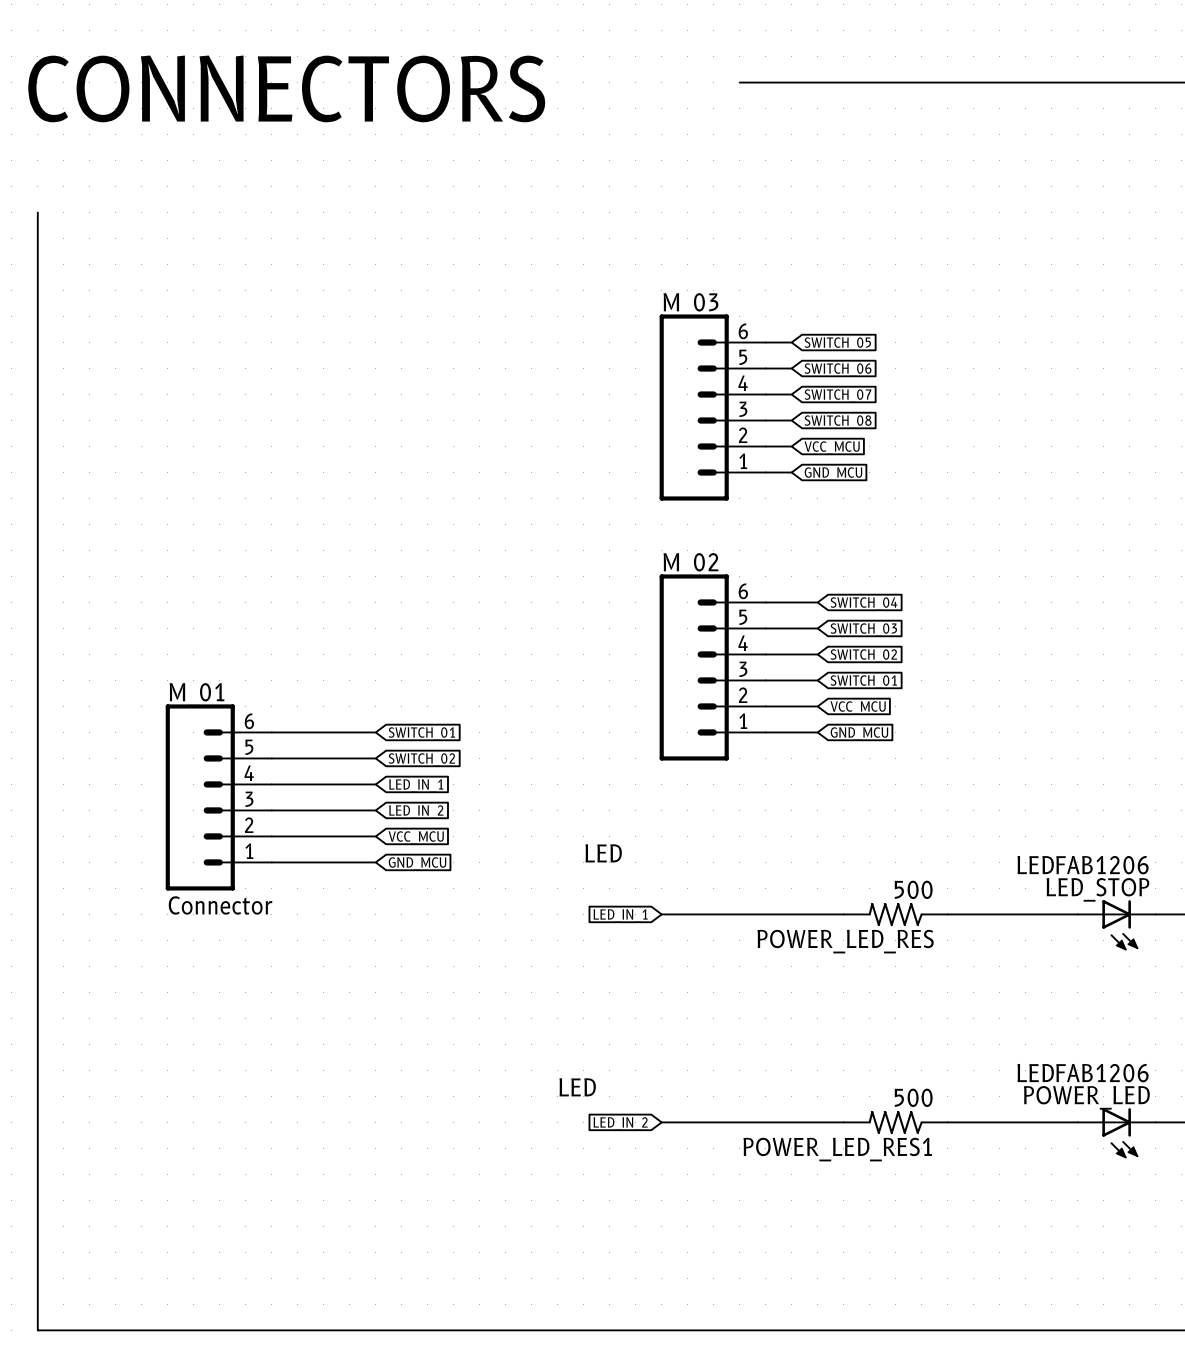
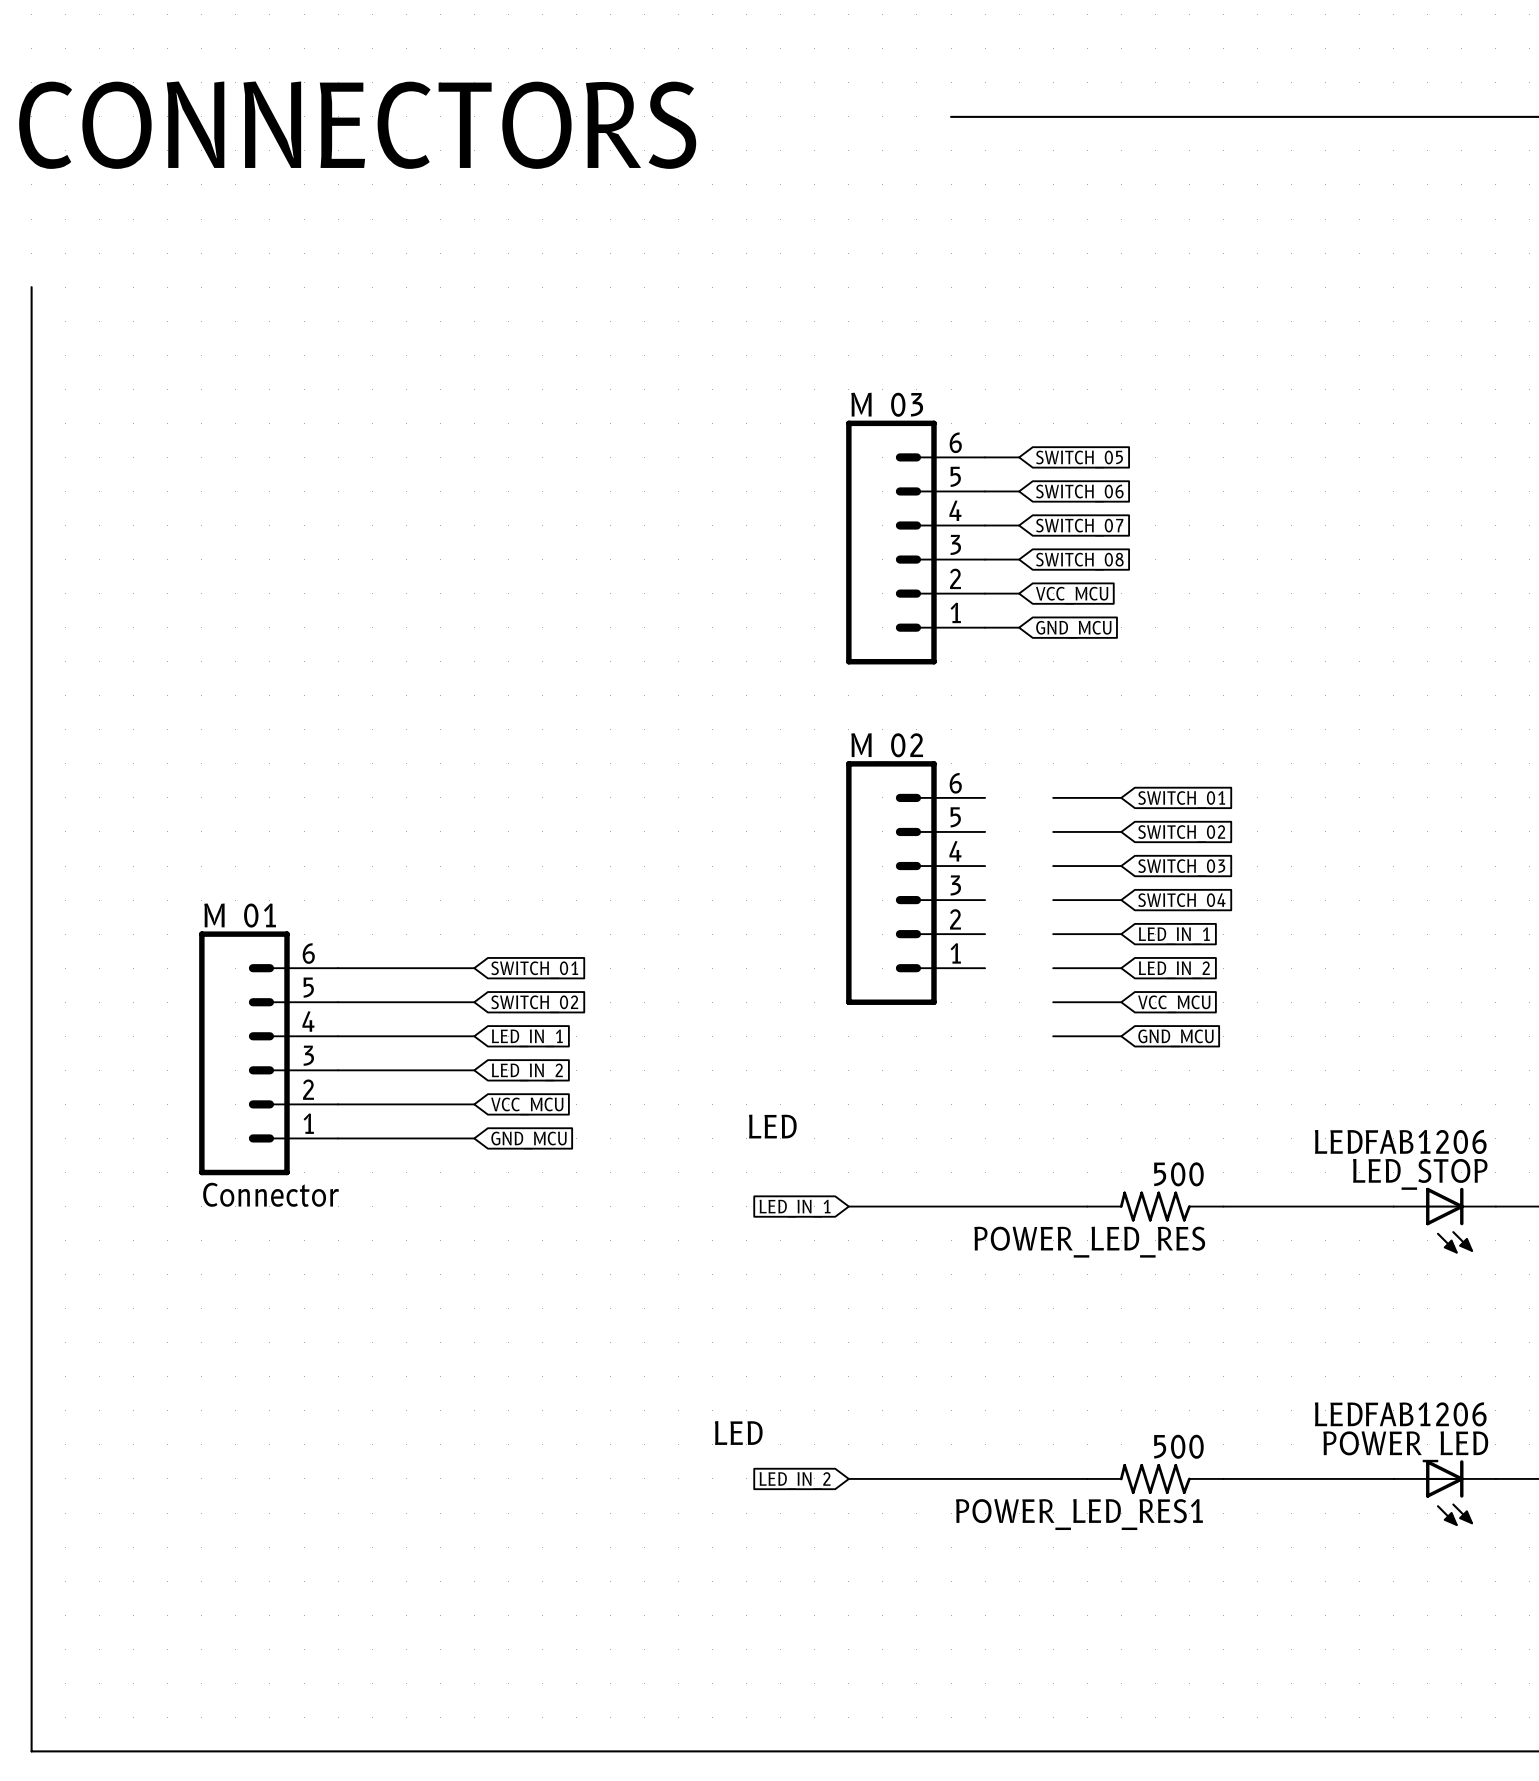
wire: (765, 602) (817, 602) -> (1121, 797) (1053, 797)
global label position: SWITCH_04 (863, 604) -> SWITCH_04 (1181, 902)
wire: (765, 628) (817, 628) -> (1121, 831) (1053, 831)
global label position: SWITCH_03 (863, 630) -> SWITCH_03 (1181, 868)
wire: (765, 654) (817, 654) -> (1121, 866) (1053, 866)
global label position: SWITCH_02 (863, 656) -> SWITCH_02 (1181, 834)
wire: (765, 680) (817, 680) -> (1121, 900) (1053, 900)
global label position: SWITCH_01 (863, 682) -> SWITCH_01 (1181, 799)
wire: (765, 706) (817, 706) -> (1121, 934) (1053, 934)
global label position: VCC_MCU (858, 708) -> VCC_MCU (1174, 1004)
global label: none -> LED_IN_1 (1174, 936)
wire: (765, 732) (817, 732) -> (1121, 968) (1053, 968)
global label position: GND_MCU (859, 734) -> GND_MCU (1175, 1038)
global label: none -> LED_IN_2 (1174, 970)
wire: none -> (1053, 1002) (1121, 1002)
wire: none -> (1053, 1036) (1121, 1036)

